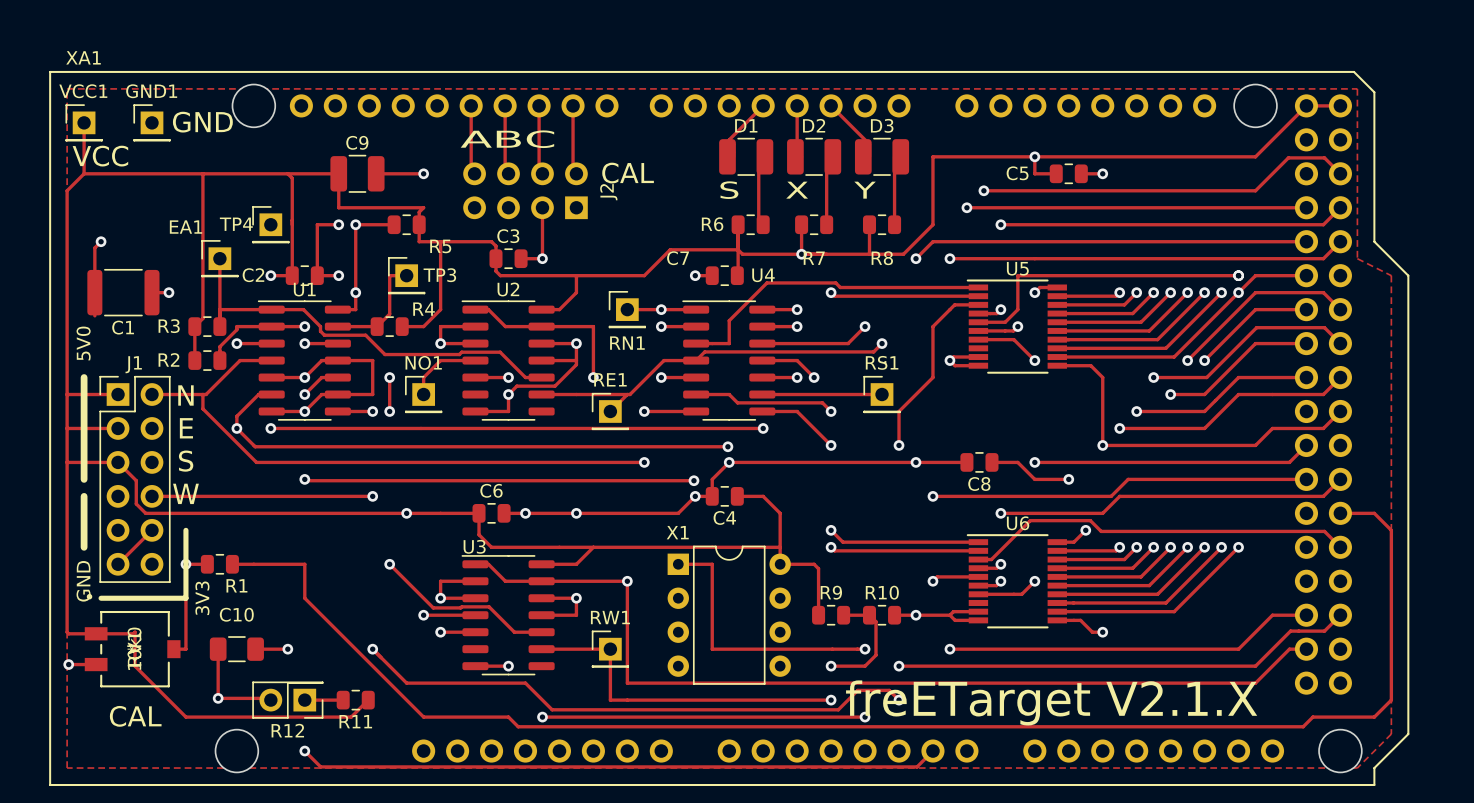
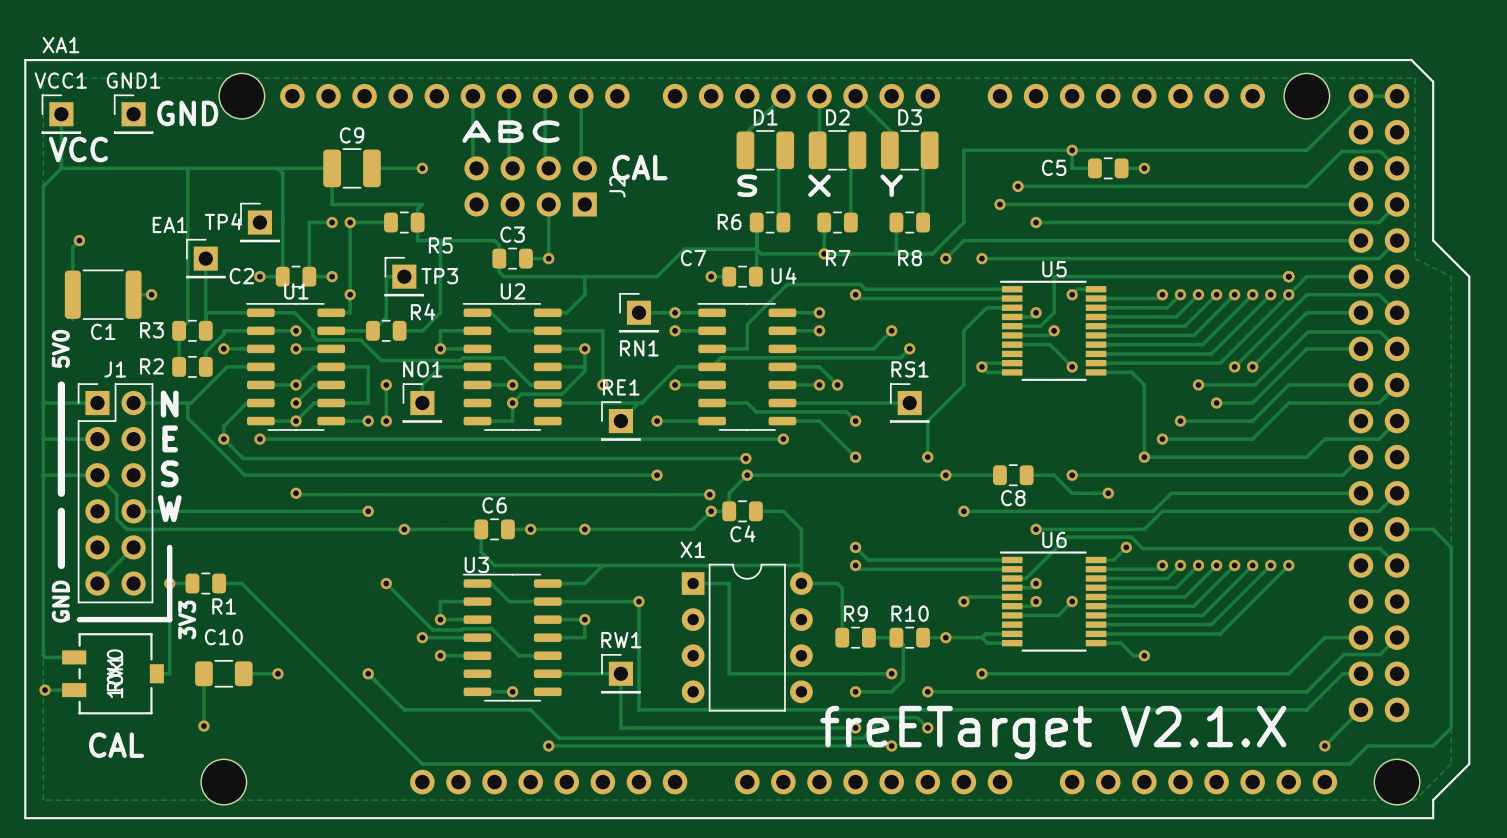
track: (253, 564) (304, 564) (304, 598) (423, 717) (508, 717) (518, 726) (1303, 726) -> (241, 583) (422, 764) (1349, 764) (1357, 756)
track: (96, 633) (133, 633) (135, 632) (135, 666) (185, 717) (351, 717) (368, 700) -> none
track: none -> (1360, 709) (1324, 745)
track: (218, 698) (269, 698) (270, 700) -> none
R12: (287, 700) -> none
track: (304, 700) (343, 700) -> none
R11: (355, 700) -> none
text position: freETarget V2.1.X (1051, 702) -> freETarget V2.1.X (1053, 732)
via: none -> (1324, 745)
track: (304, 751) (320, 766) (917, 766) (932, 751) -> none
via: (304, 751) -> none

